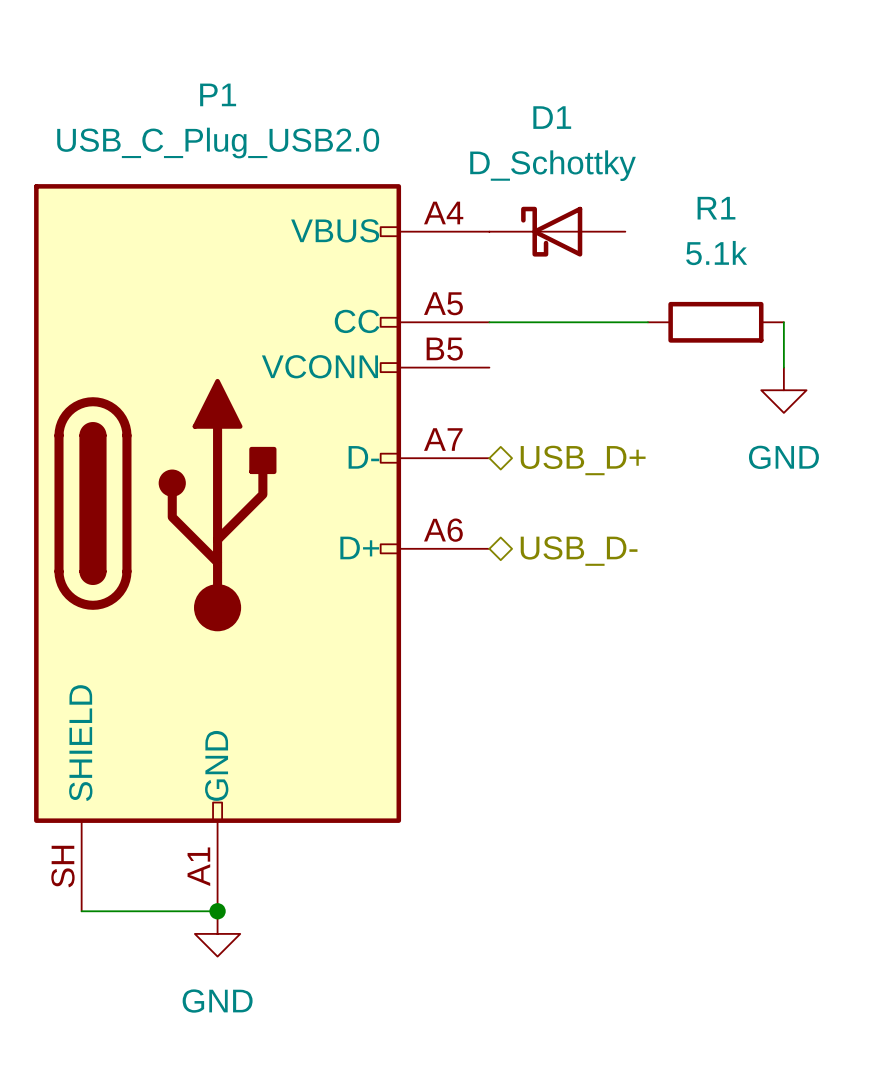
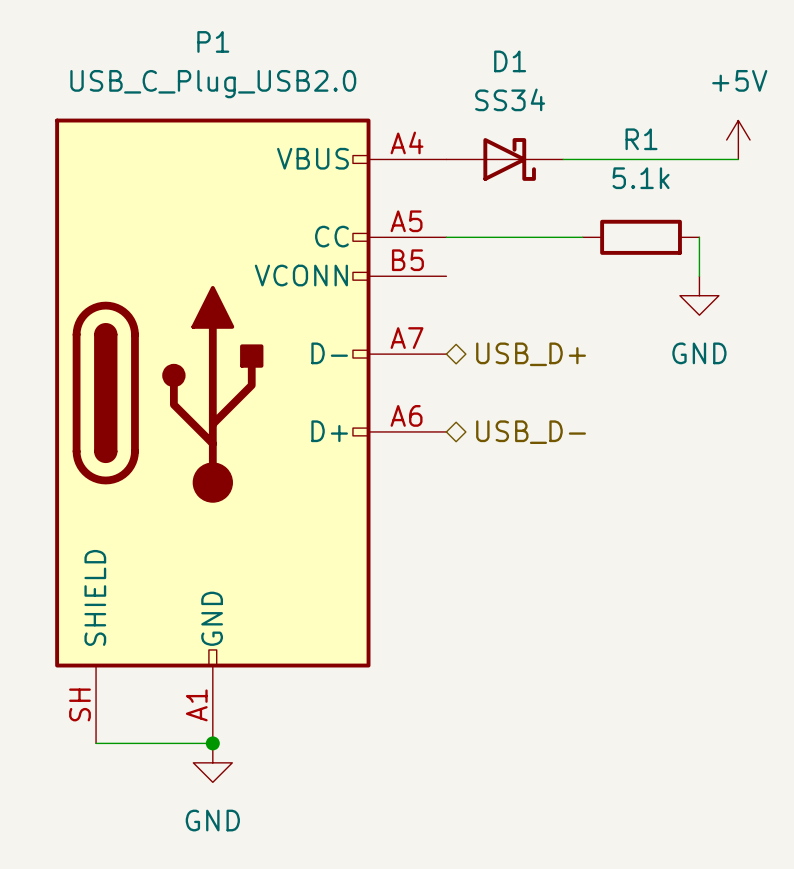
D1 value: D_Schottky (553, 165) -> SS34 (510, 99)
power symbol: none -> +5V (738, 140)
D1 rotation: 0° (551, 231) -> 180° (509, 159)
wire: none -> (563, 159) (738, 159)

